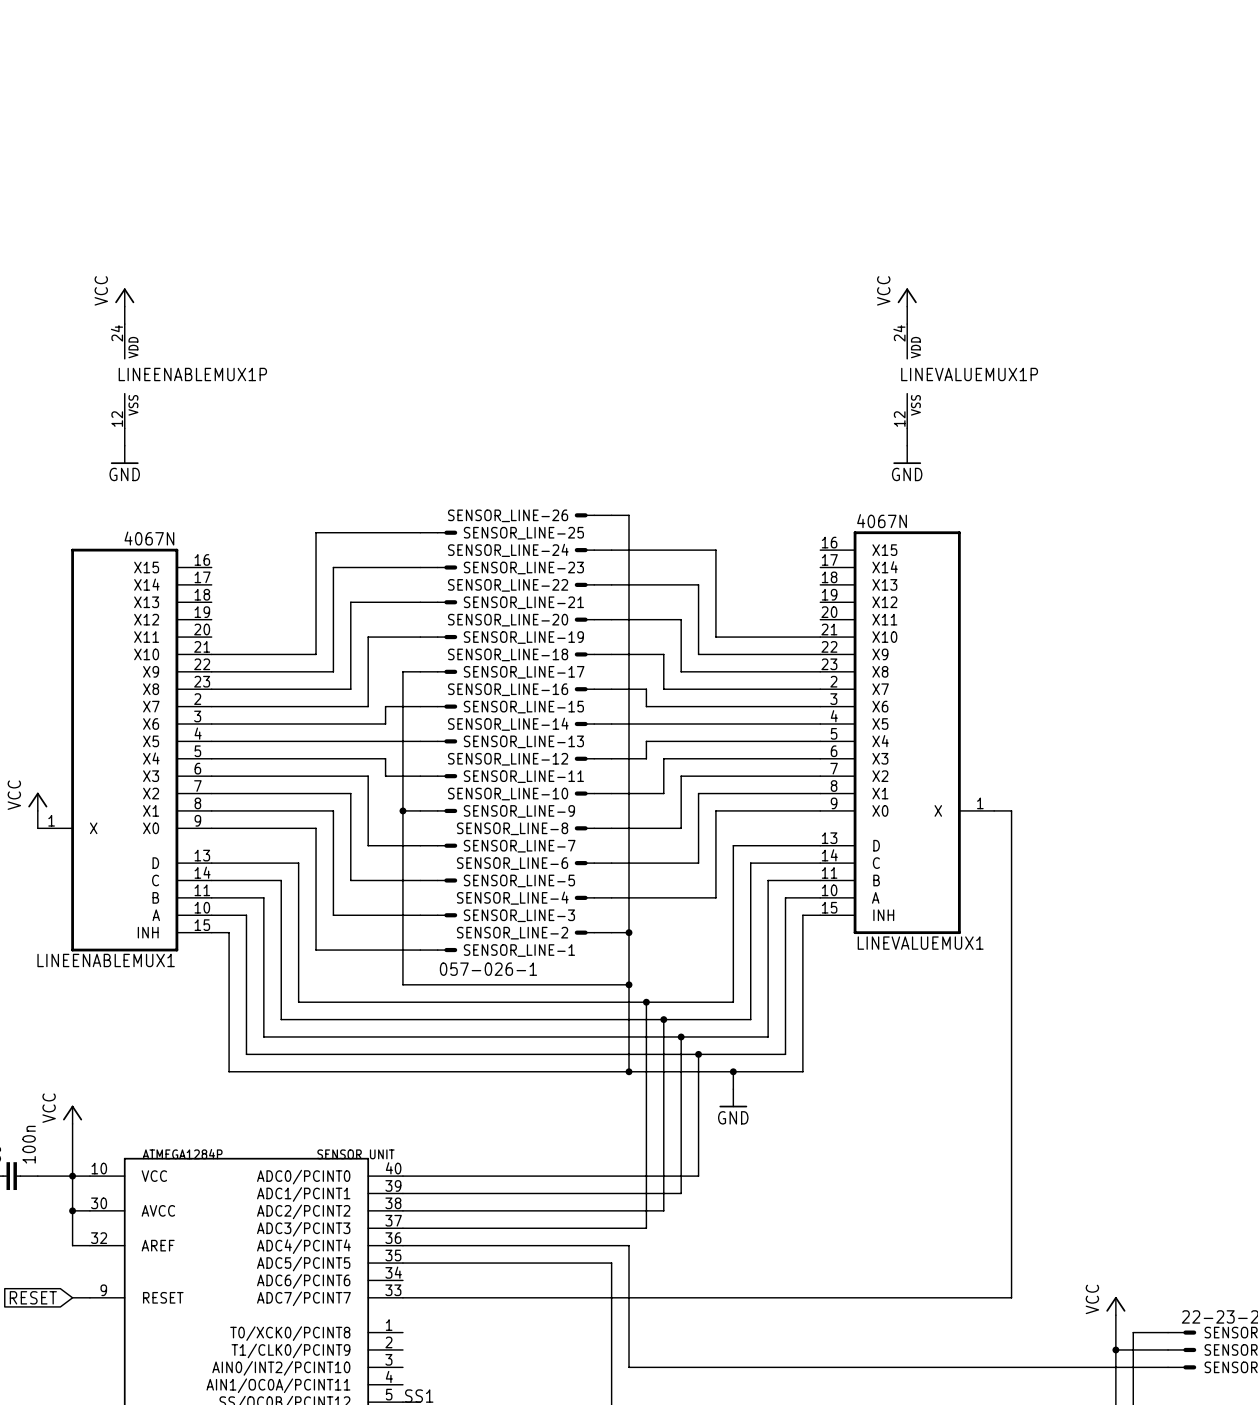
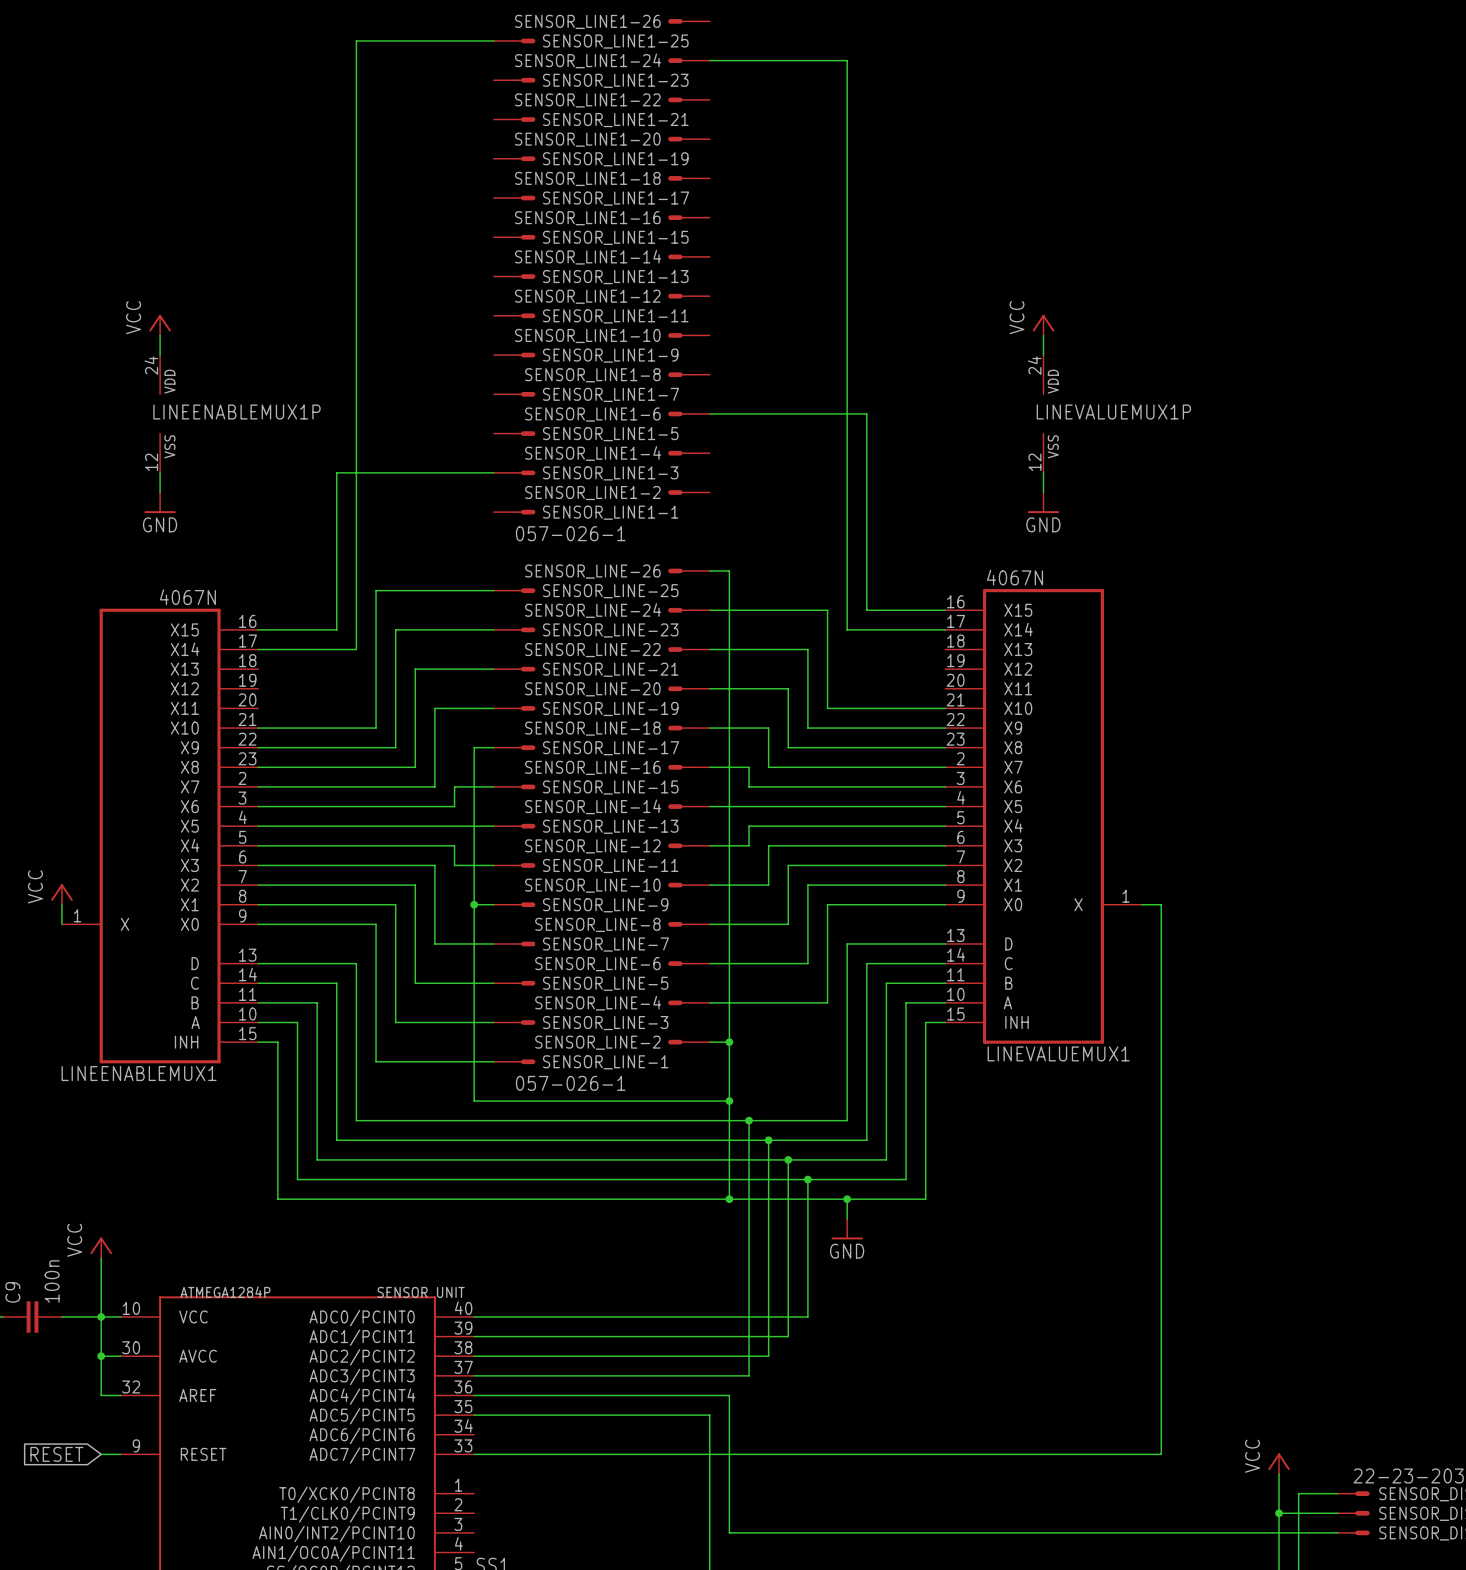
SENSOR_LINE1-26: none -> (688, 21)
wire: none -> (493, 40) (356, 40) (356, 649) (258, 649)
SENSOR_LINE1-25: none -> (514, 40)
SENSOR_LINE1-24: none -> (688, 60)
wire: none -> (709, 60) (847, 60) (847, 629) (945, 629)
SENSOR_LINE1-23: none -> (514, 80)
SENSOR_LINE1-22: none -> (688, 99)
SENSOR_LINE1-21: none -> (514, 119)
SENSOR_LINE1-20: none -> (688, 139)
SENSOR_LINE1-19: none -> (514, 158)
SENSOR_LINE1-18: none -> (688, 178)
SENSOR_LINE1-17: none -> (514, 198)
SENSOR_LINE1-16: none -> (688, 217)
SENSOR_LINE1-15: none -> (514, 237)
SENSOR_LINE1-14: none -> (688, 256)
SENSOR_LINE1-13: none -> (514, 276)
SENSOR_LINE1-12: none -> (688, 296)
SENSOR_LINE1-11: none -> (514, 315)
SENSOR_LINE1-10: none -> (688, 335)
SENSOR_LINE1-9: none -> (514, 355)
SENSOR_LINE1-8: none -> (688, 374)
SENSOR_LINE1-7: none -> (514, 394)
SENSOR_LINE1-6: none -> (688, 413)
wire: none -> (709, 413) (866, 413) (866, 610) (945, 610)
SENSOR_LINE1-5: none -> (514, 433)
SENSOR_LINE1-4: none -> (688, 453)
wire: none -> (493, 472) (336, 472) (336, 629) (258, 629)
SENSOR_LINE1-3: none -> (514, 472)
SENSOR_LINE1-2: none -> (688, 492)
SENSOR_LINE1-1: none -> 057-026-1 (514, 512)

